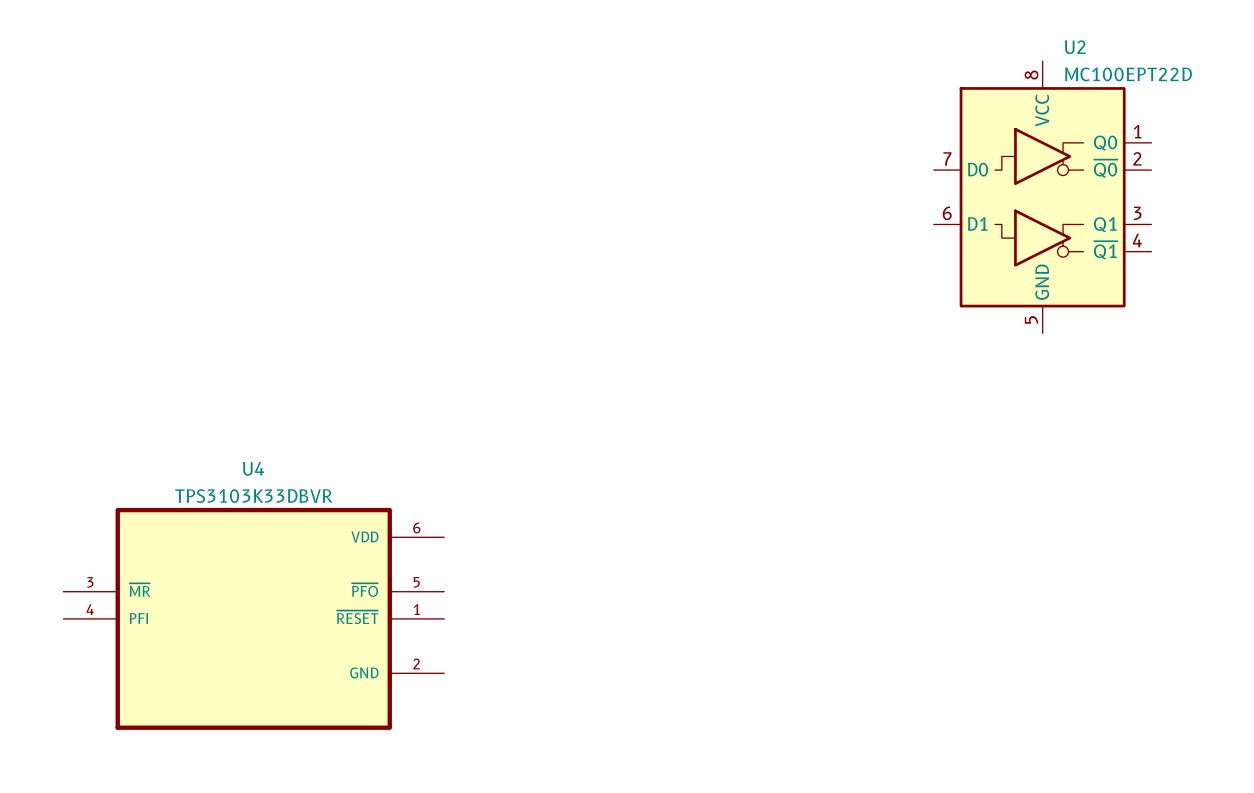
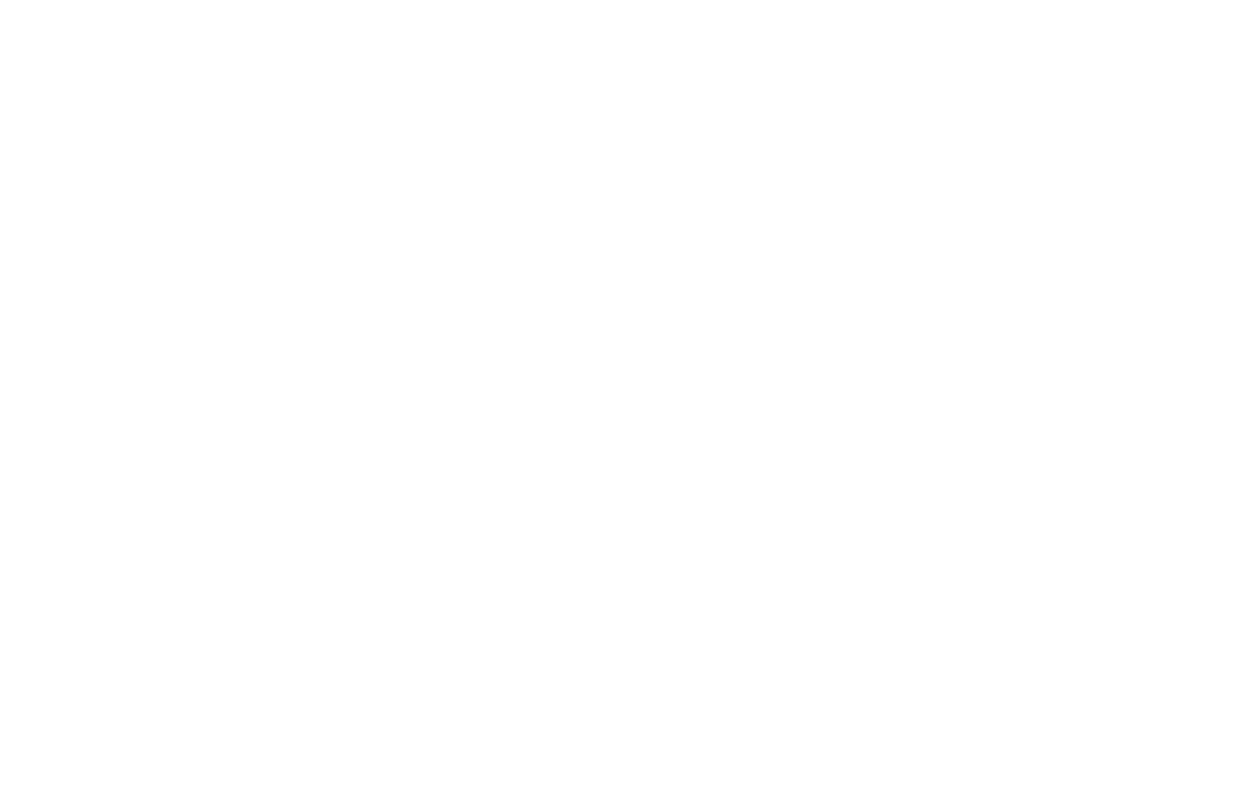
U2: MC100EPT22D (1042, 197) -> none
U4: TPS3103K33DBVR (253, 618) -> none

